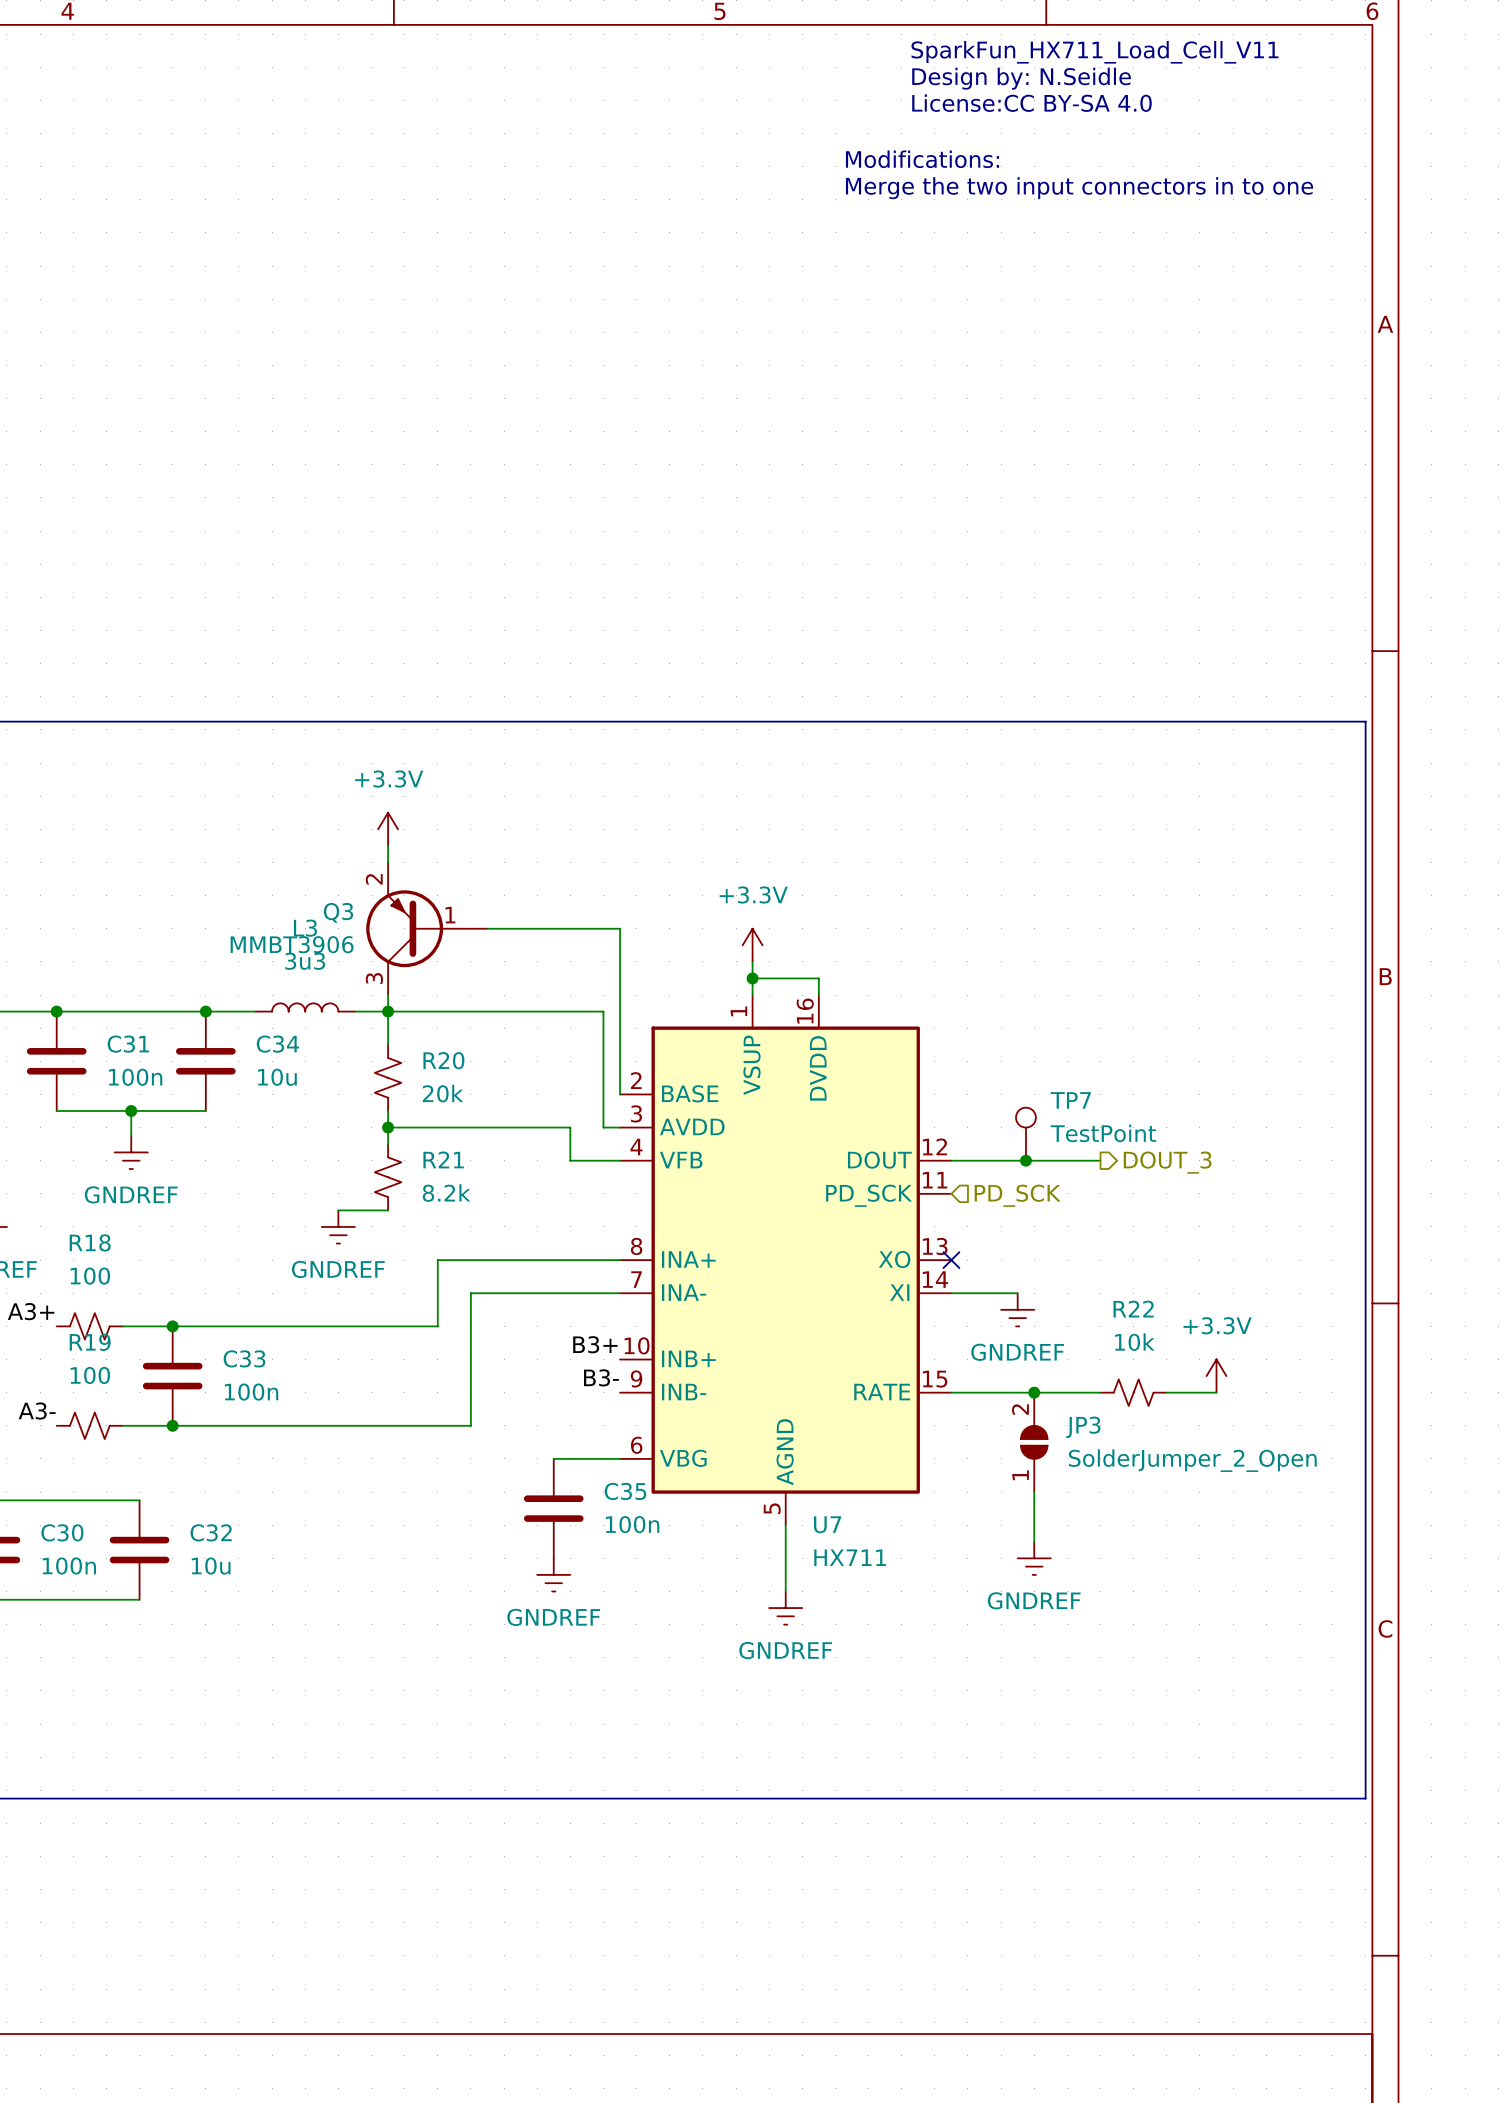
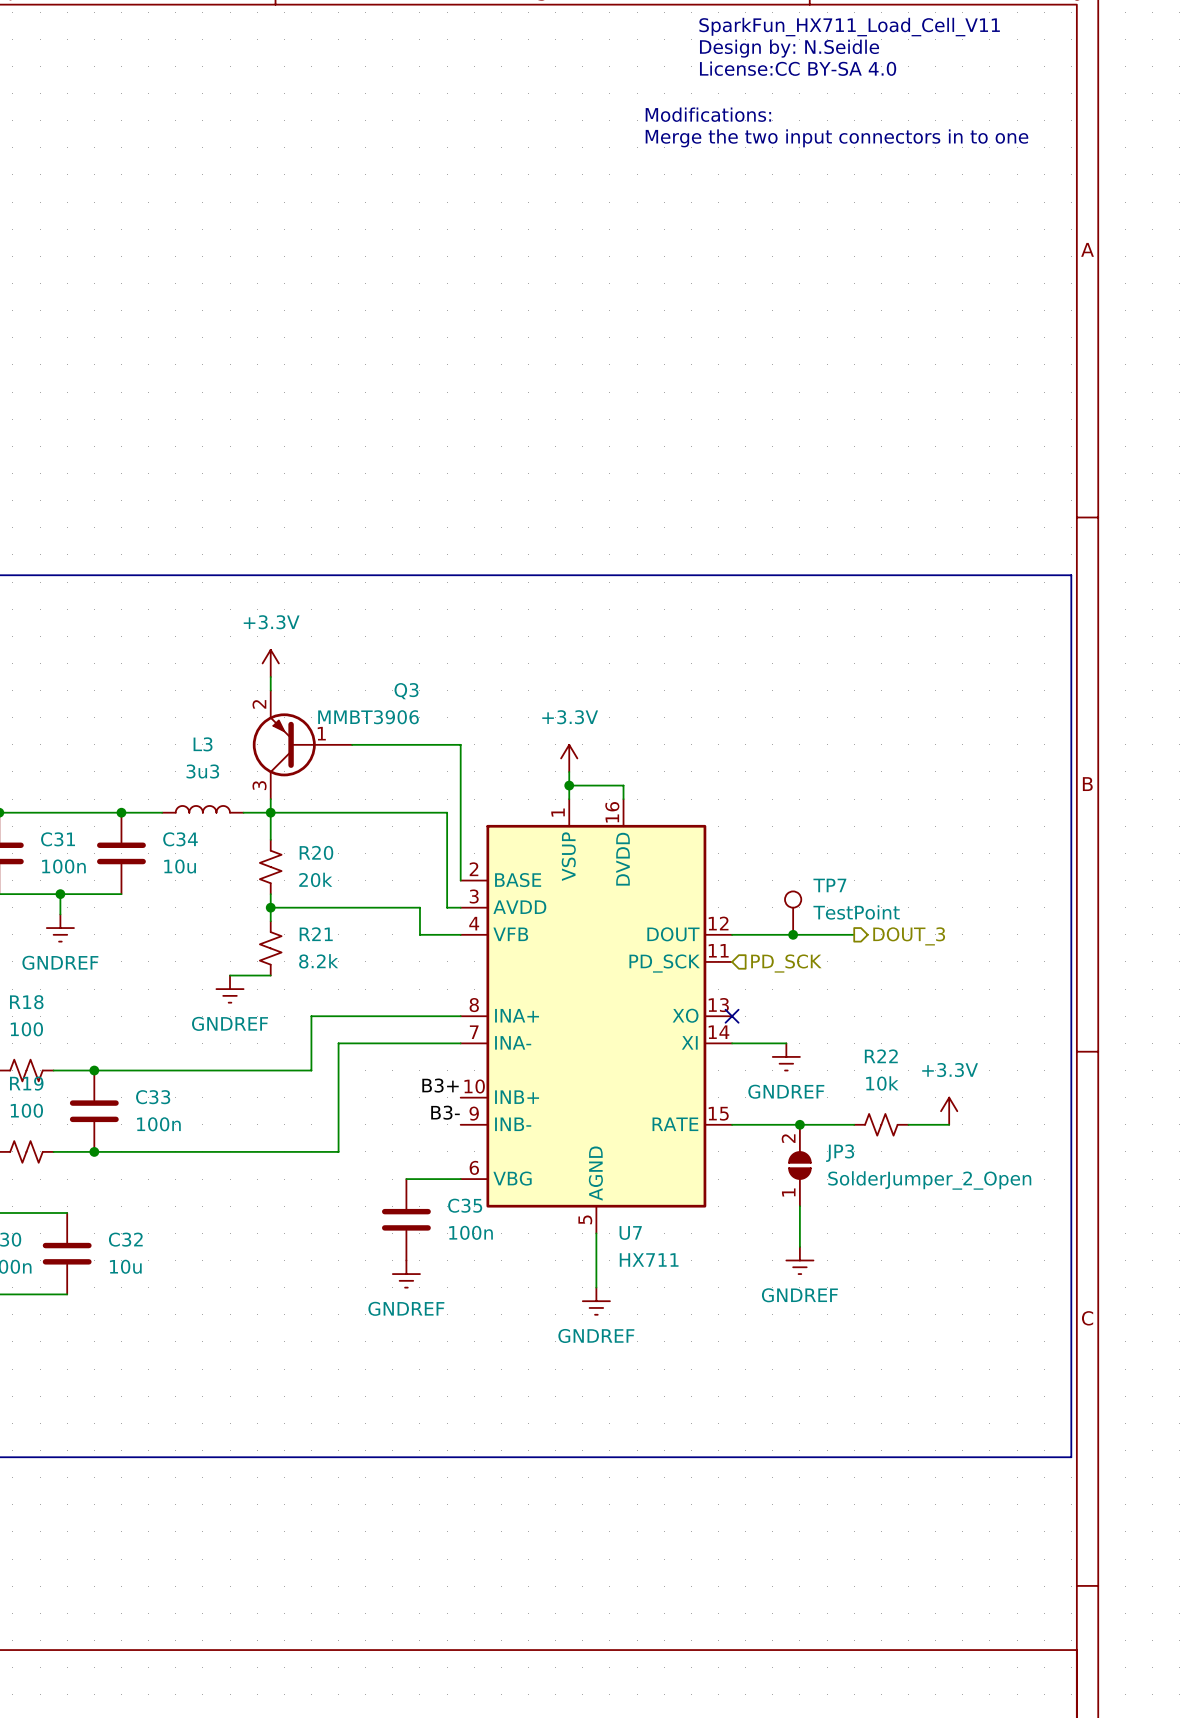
Q3 name position: Q3 (338, 912) -> Q3 (406, 691)
Q3 value position: MMBT3906 (292, 944) -> MMBT3906 (368, 717)

